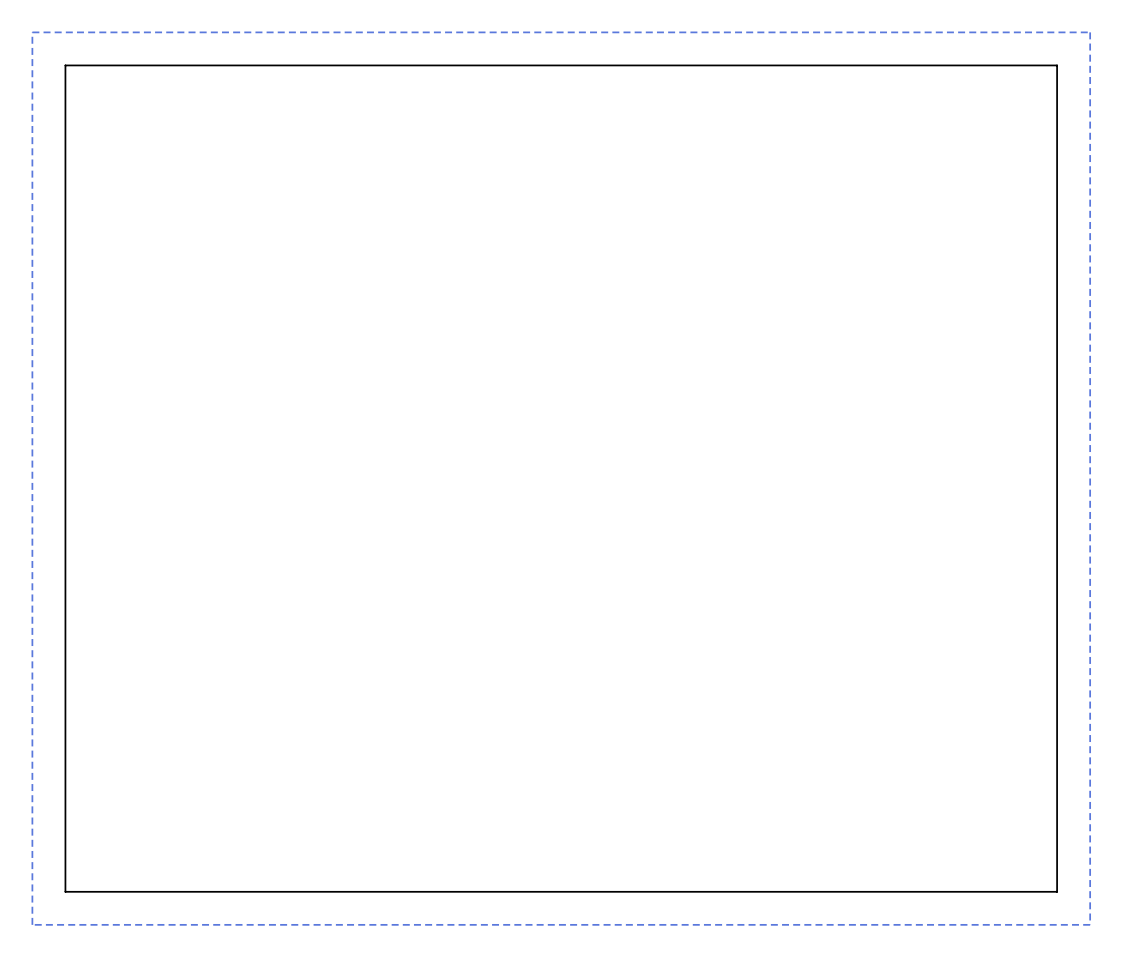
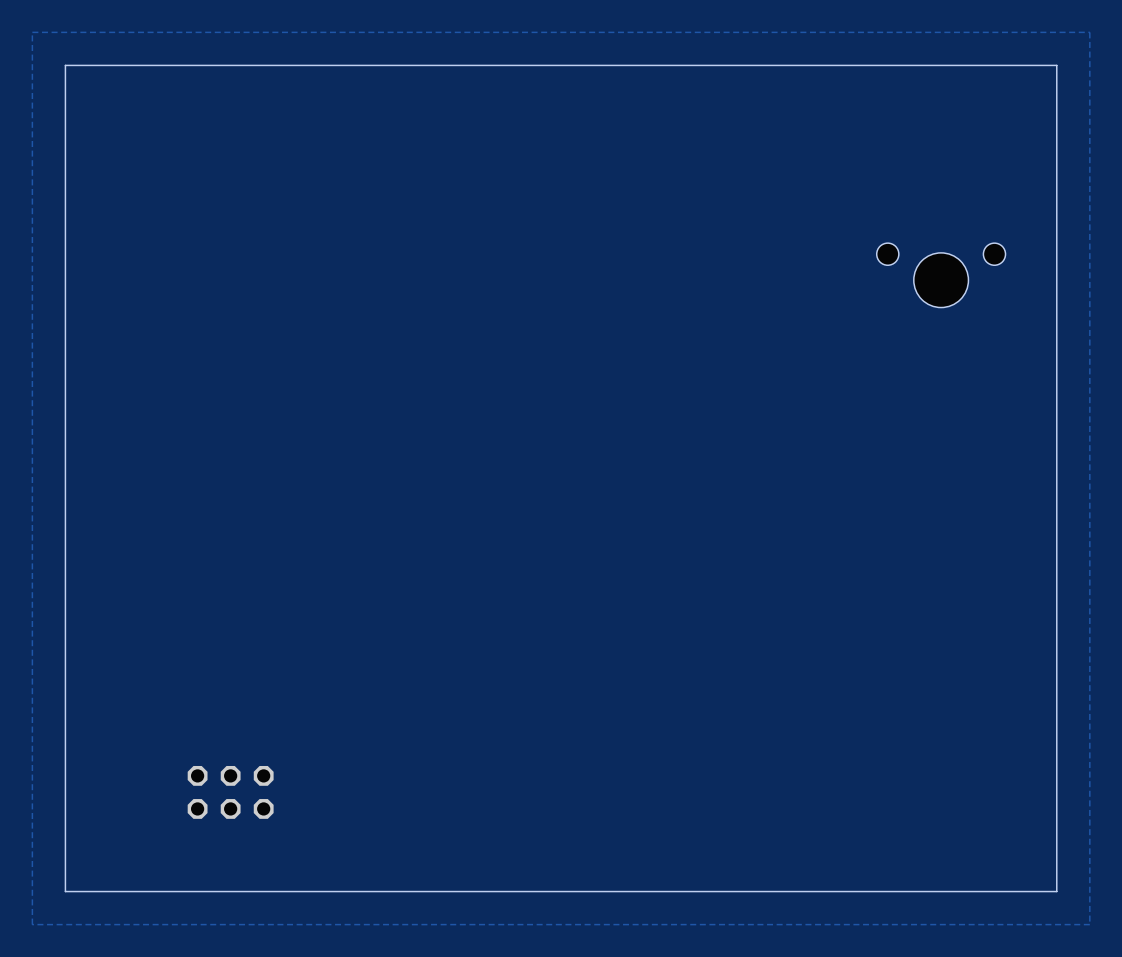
part: none -> (941, 275)
part: none -> (230, 792)

